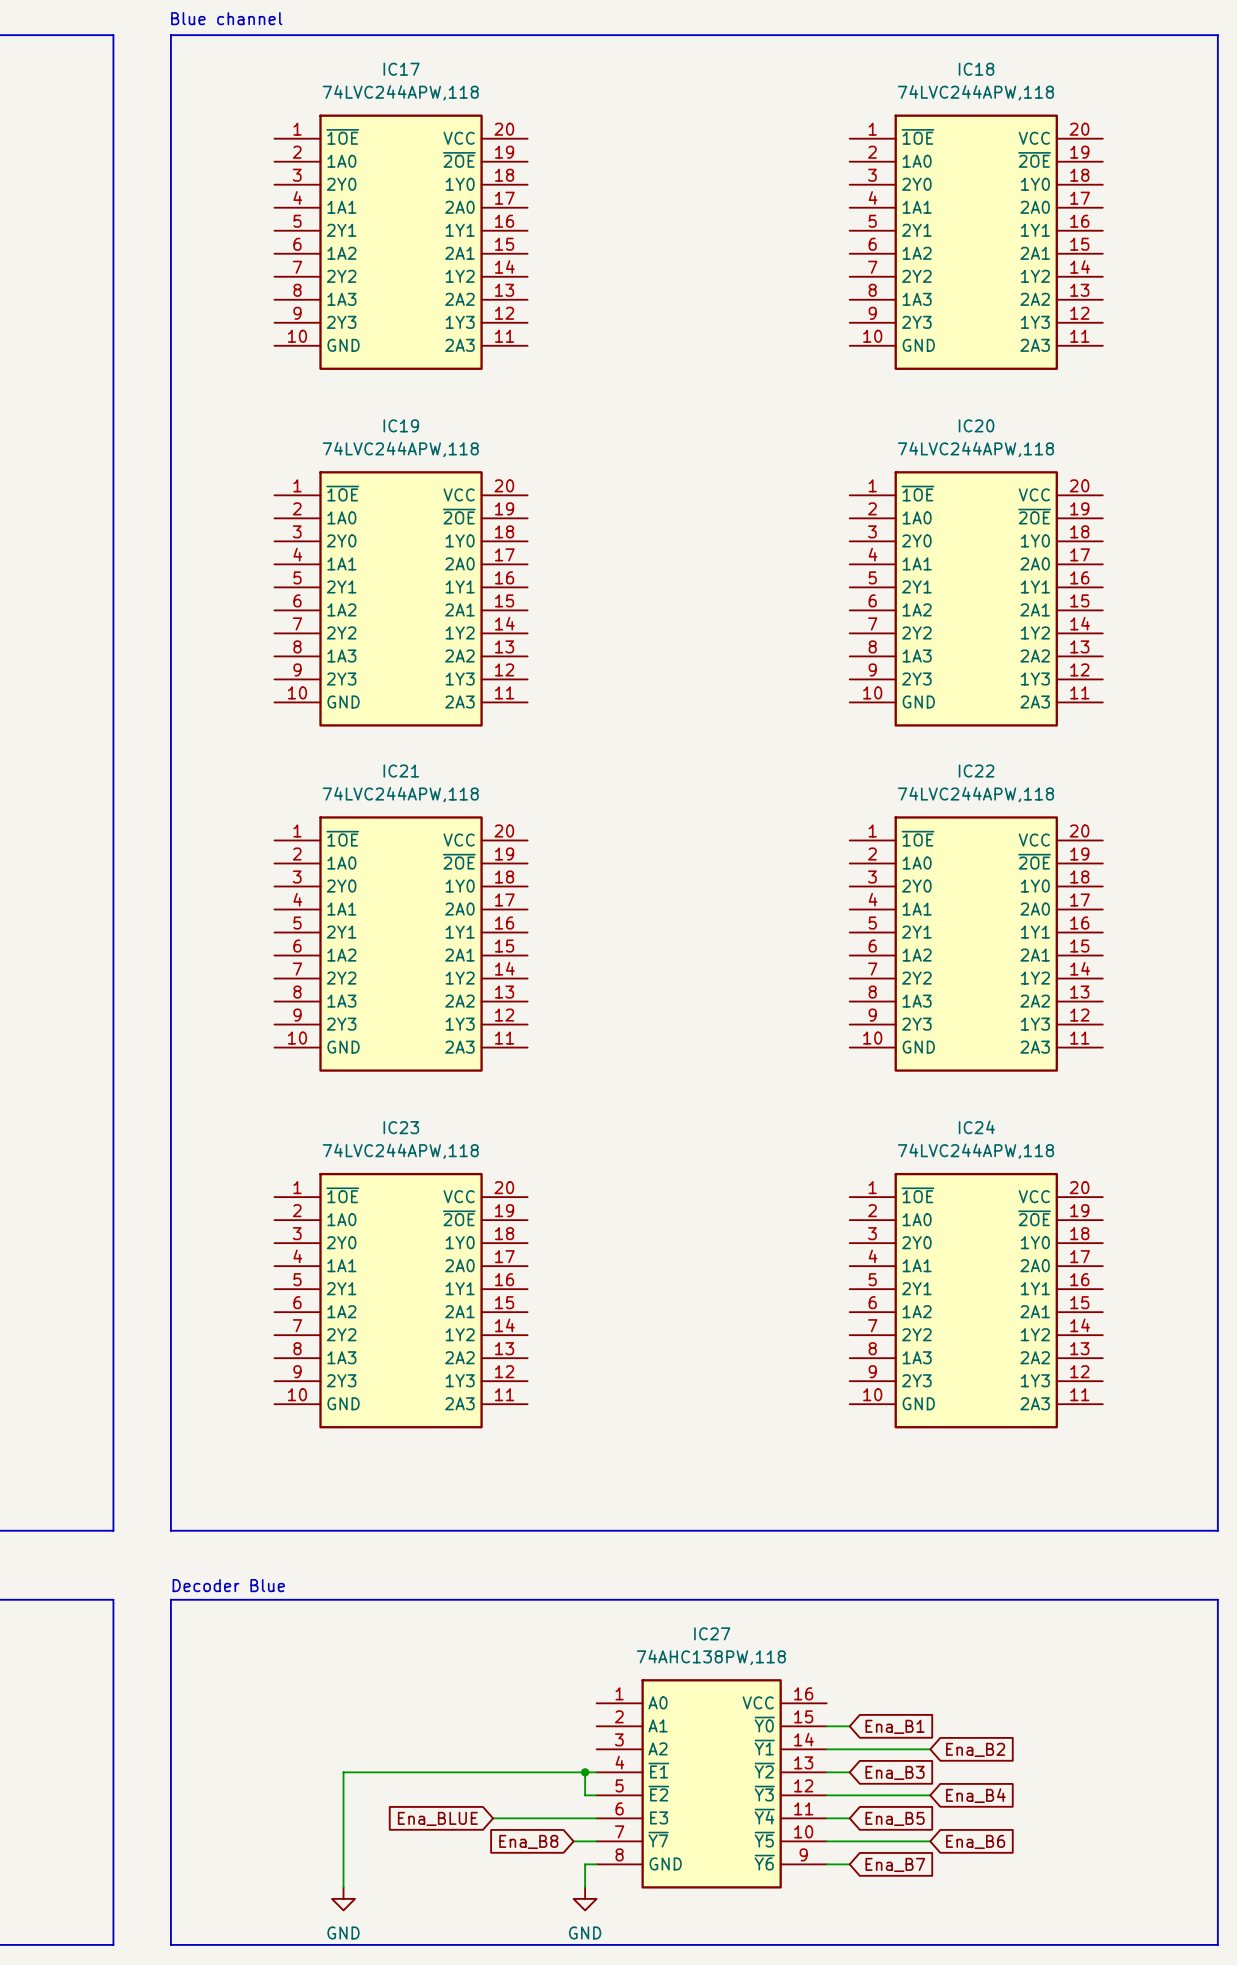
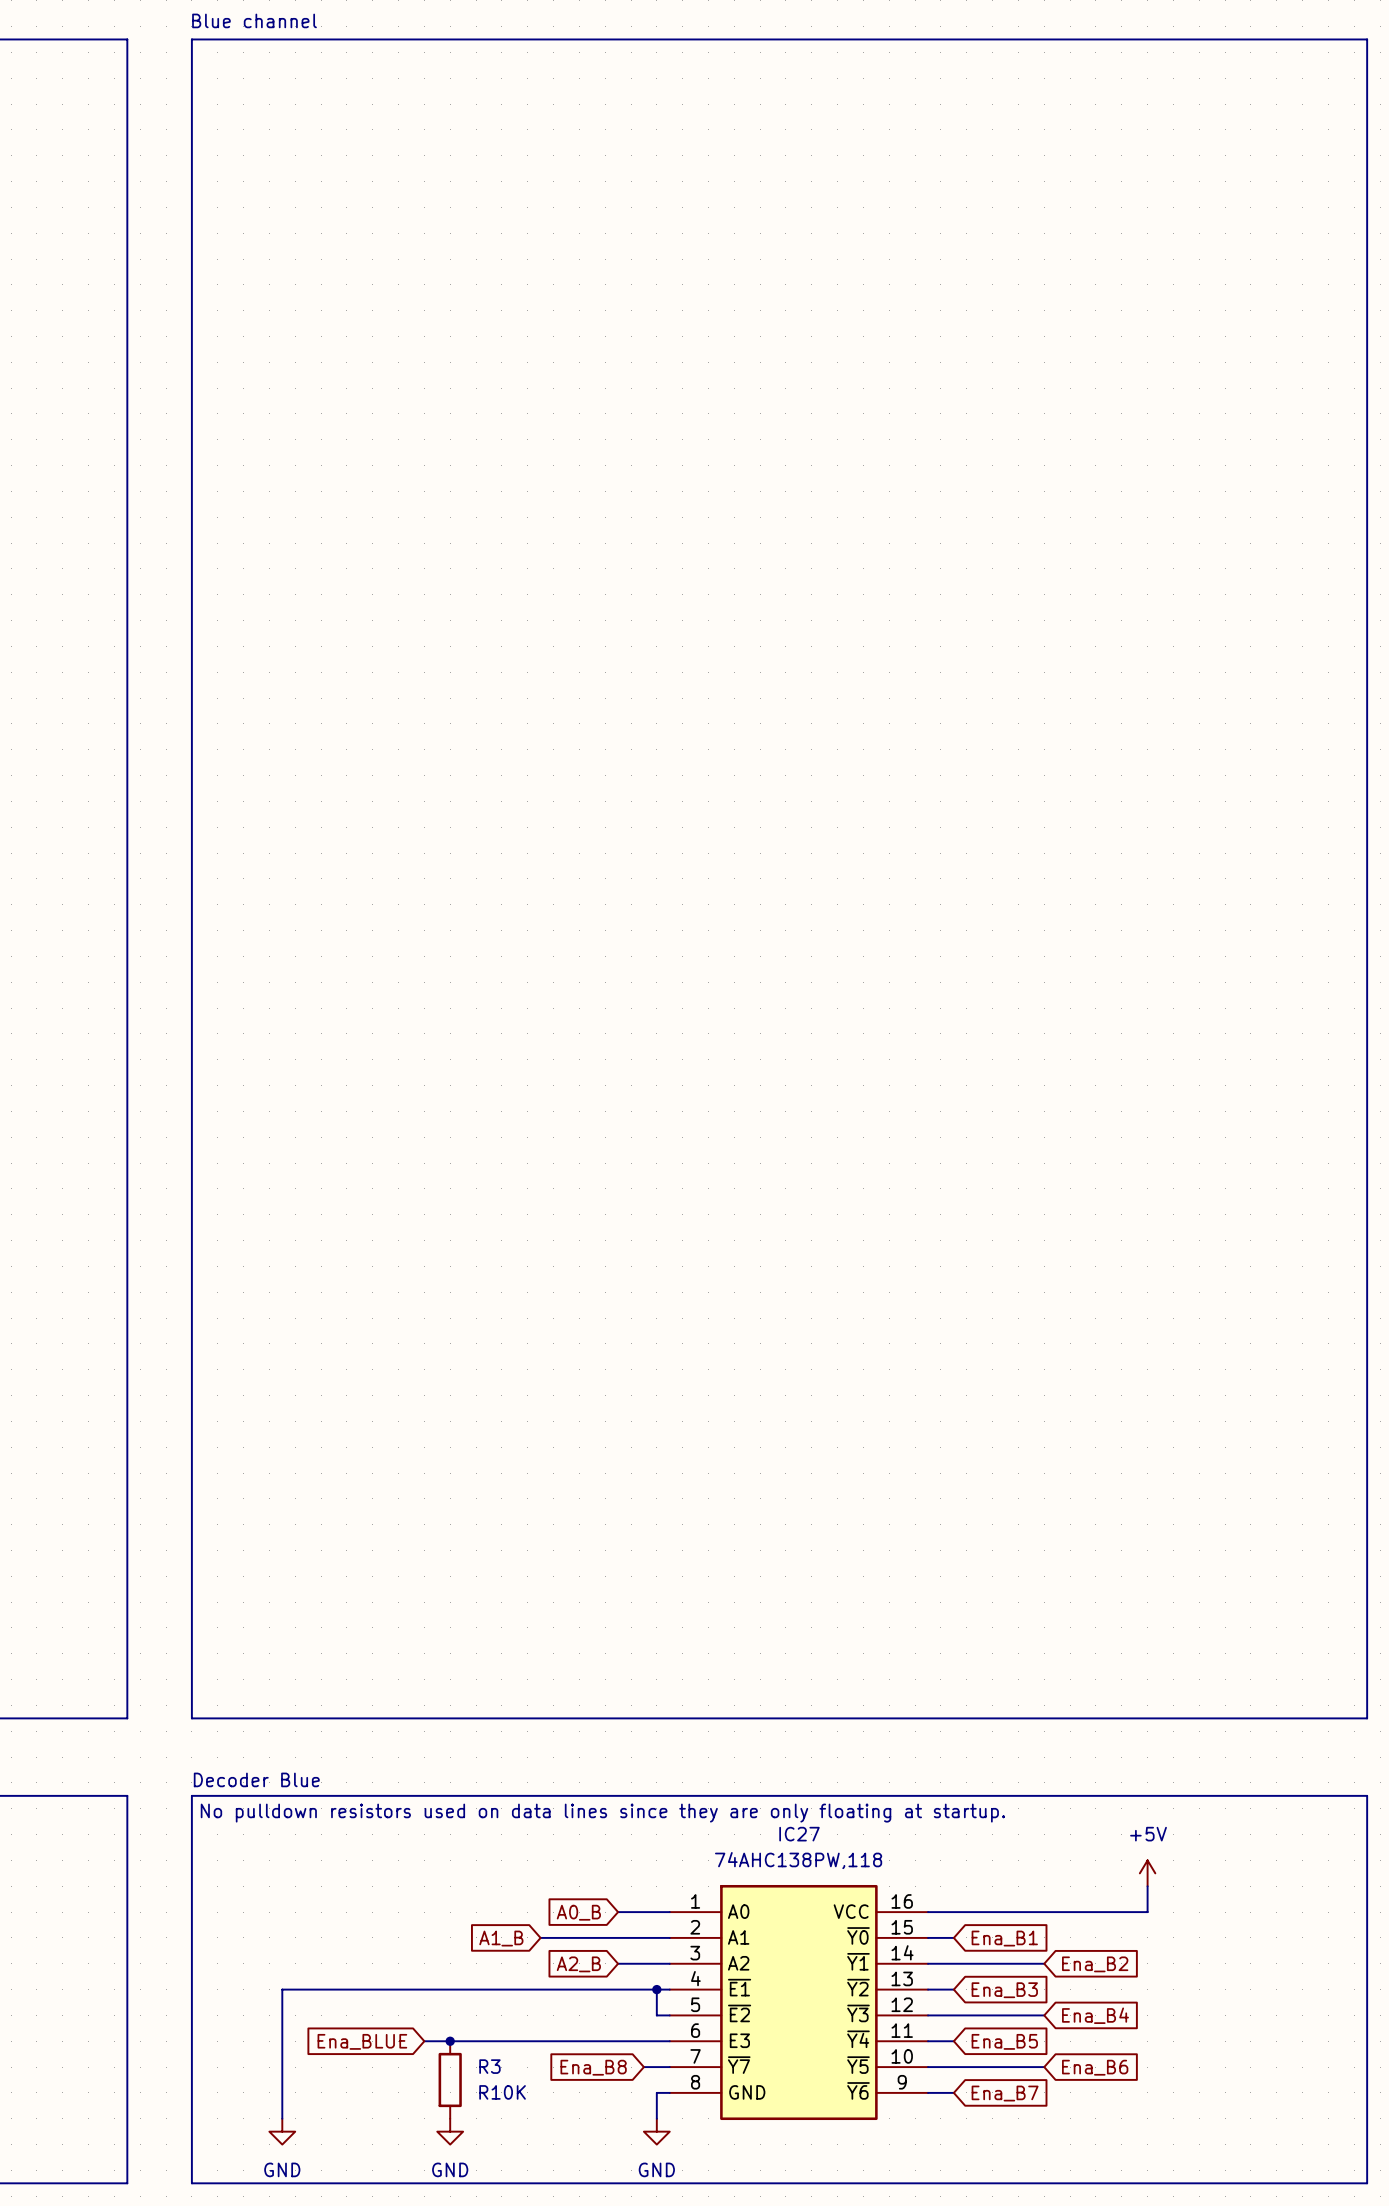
IC17: 74LVC244APW,118 (401, 242) -> none
IC18: 74LVC244APW,118 (976, 242) -> none
IC19: 74LVC244APW,118 (401, 598) -> none
IC20: 74LVC244APW,118 (976, 598) -> none
IC21: 74LVC244APW,118 (401, 944) -> none
IC22: 74LVC244APW,118 (976, 944) -> none
IC23: 74LVC244APW,118 (401, 1300) -> none
IC24: 74LVC244APW,118 (976, 1300) -> none
text: none -> No pulldown resistors used on data lines since they are only floating at startup. (602, 1813)
power symbol: none -> +5V (1147, 1873)
wire: none -> (1147, 1886) (1147, 1912) (928, 1912)
global label: none -> A0_B (578, 1912)
wire: none -> (618, 1912) (669, 1912)
global label: none -> A1_B (501, 1938)
wire: none -> (540, 1937) (669, 1937)
global label: none -> A2_B (578, 1964)
wire: none -> (618, 1963) (669, 1963)
wire: (343, 1772) (343, 1887) -> (385, 1989) (282, 1989) (282, 2118)
wire: none -> (424, 2041) (553, 2041)
junction: none -> (450, 2041)
global label position: Ena_BLUE (437, 1818) -> Ena_BLUE (362, 2041)
R3: none -> R10K (450, 2080)
power symbol: none -> GND (282, 2131)
power symbol: GND (343, 1898) -> none
power symbol: none -> GND (450, 2131)

